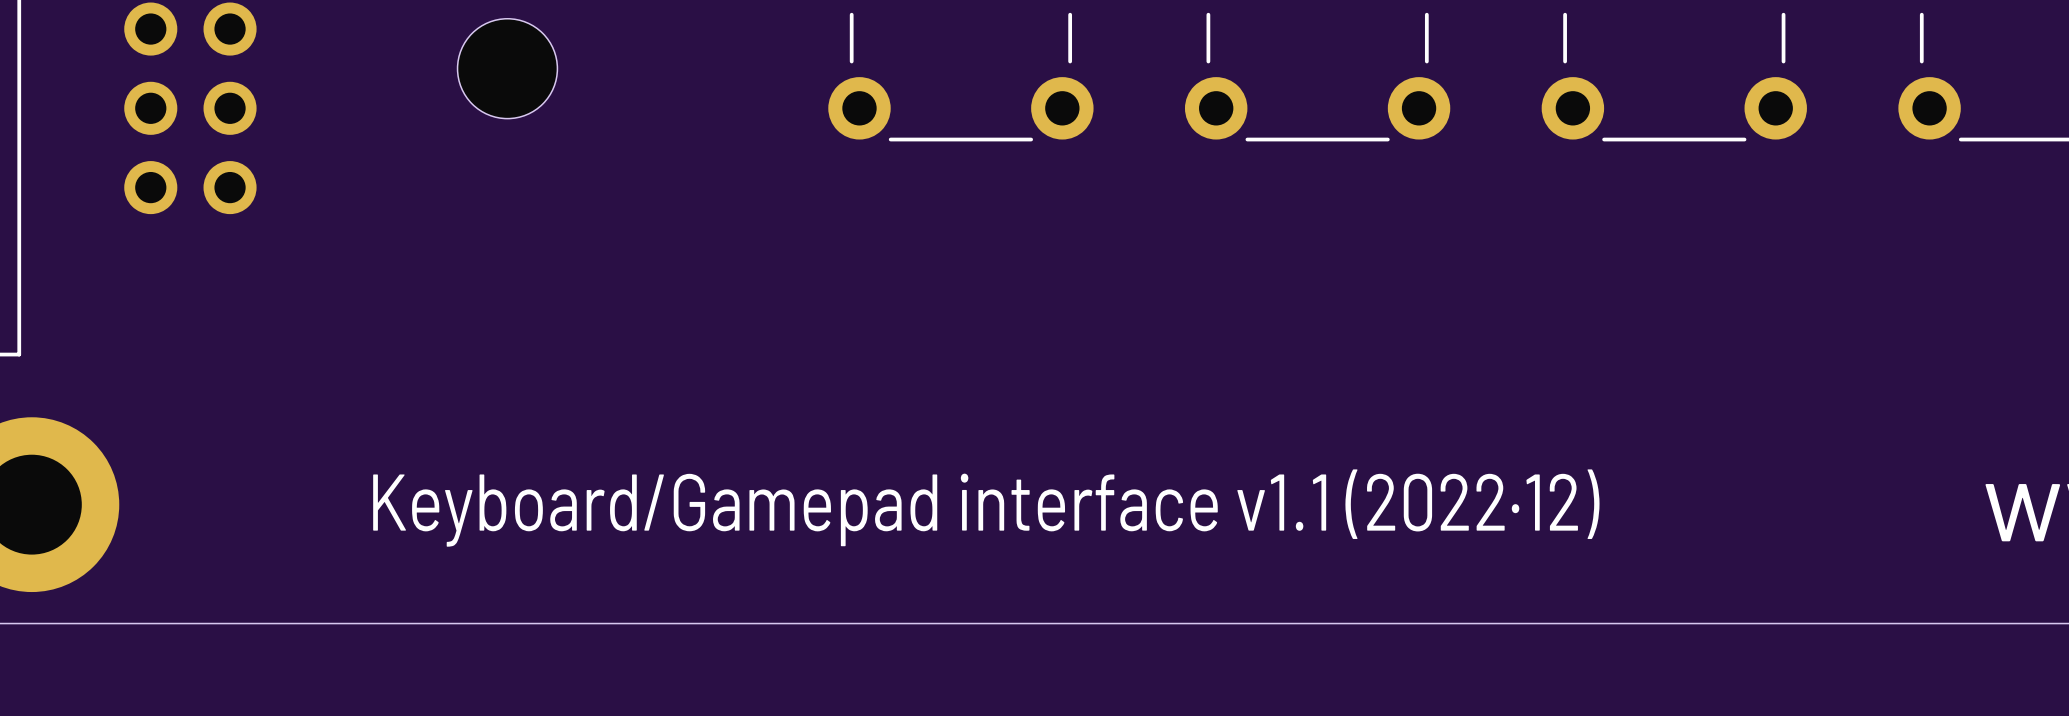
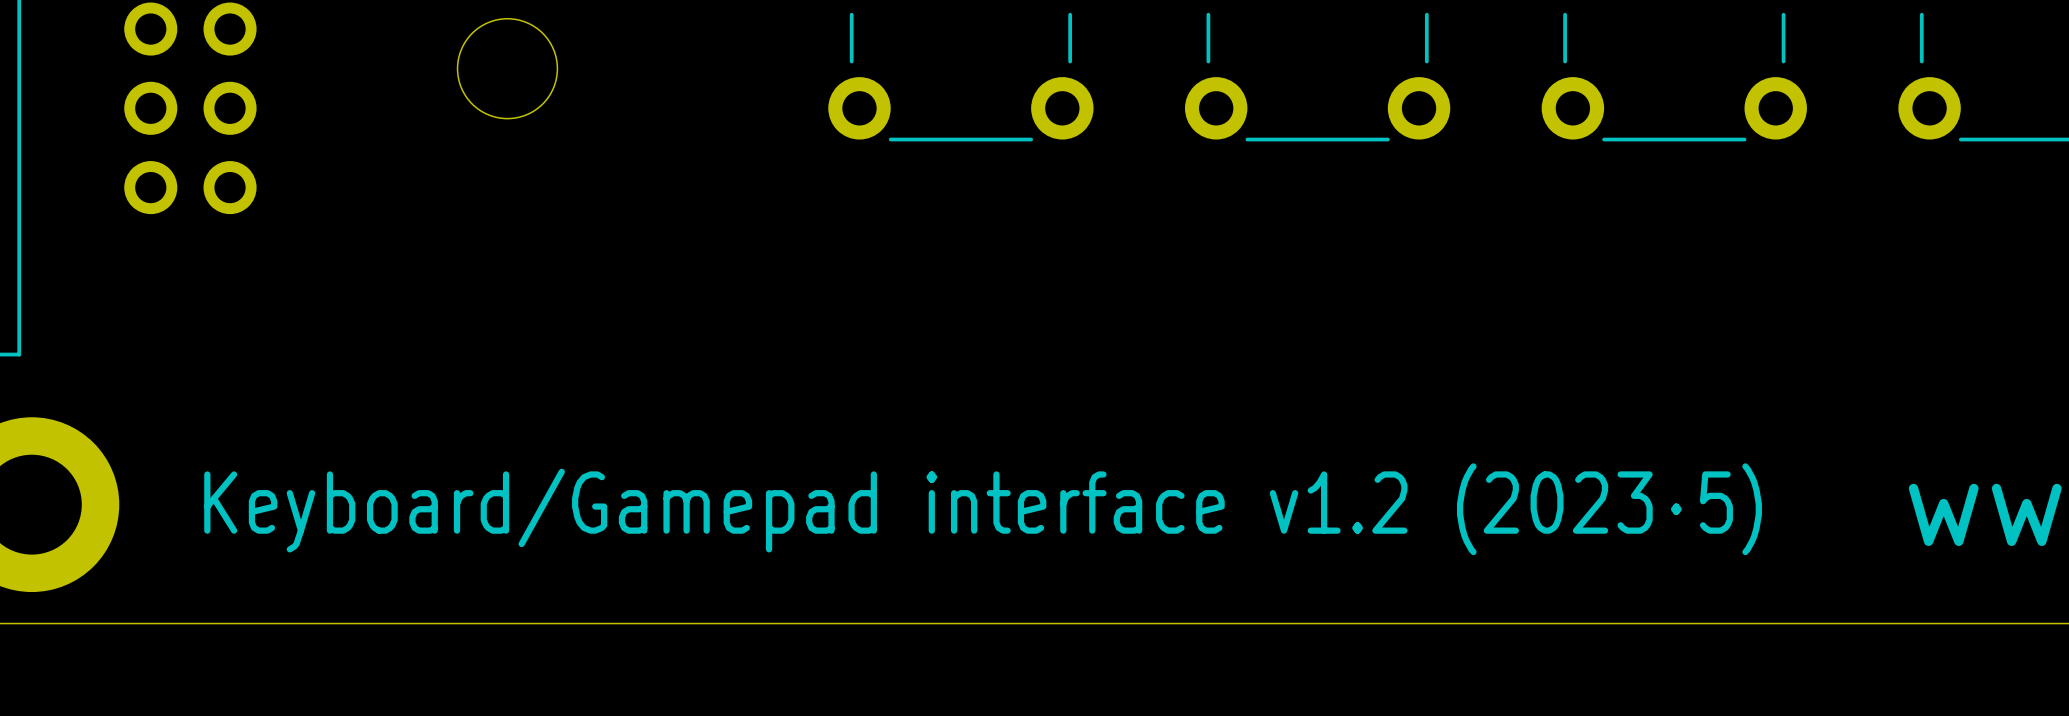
text: Keyboard/Gamepad interface v1.1 (2022·12) (986, 508) -> Keyboard/Gamepad interface v1.2 (2023·5) (983, 509)

